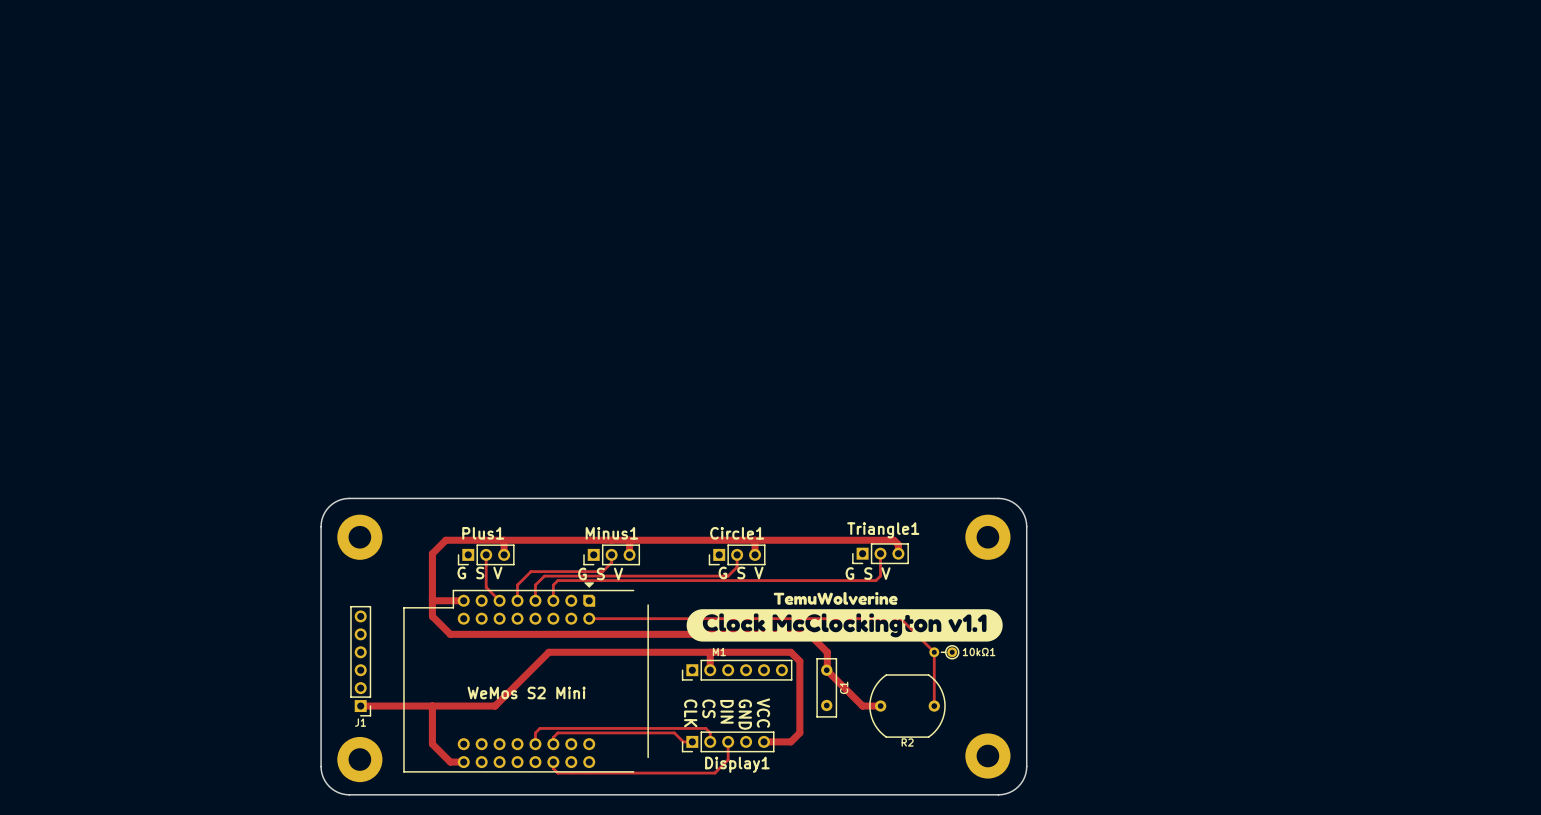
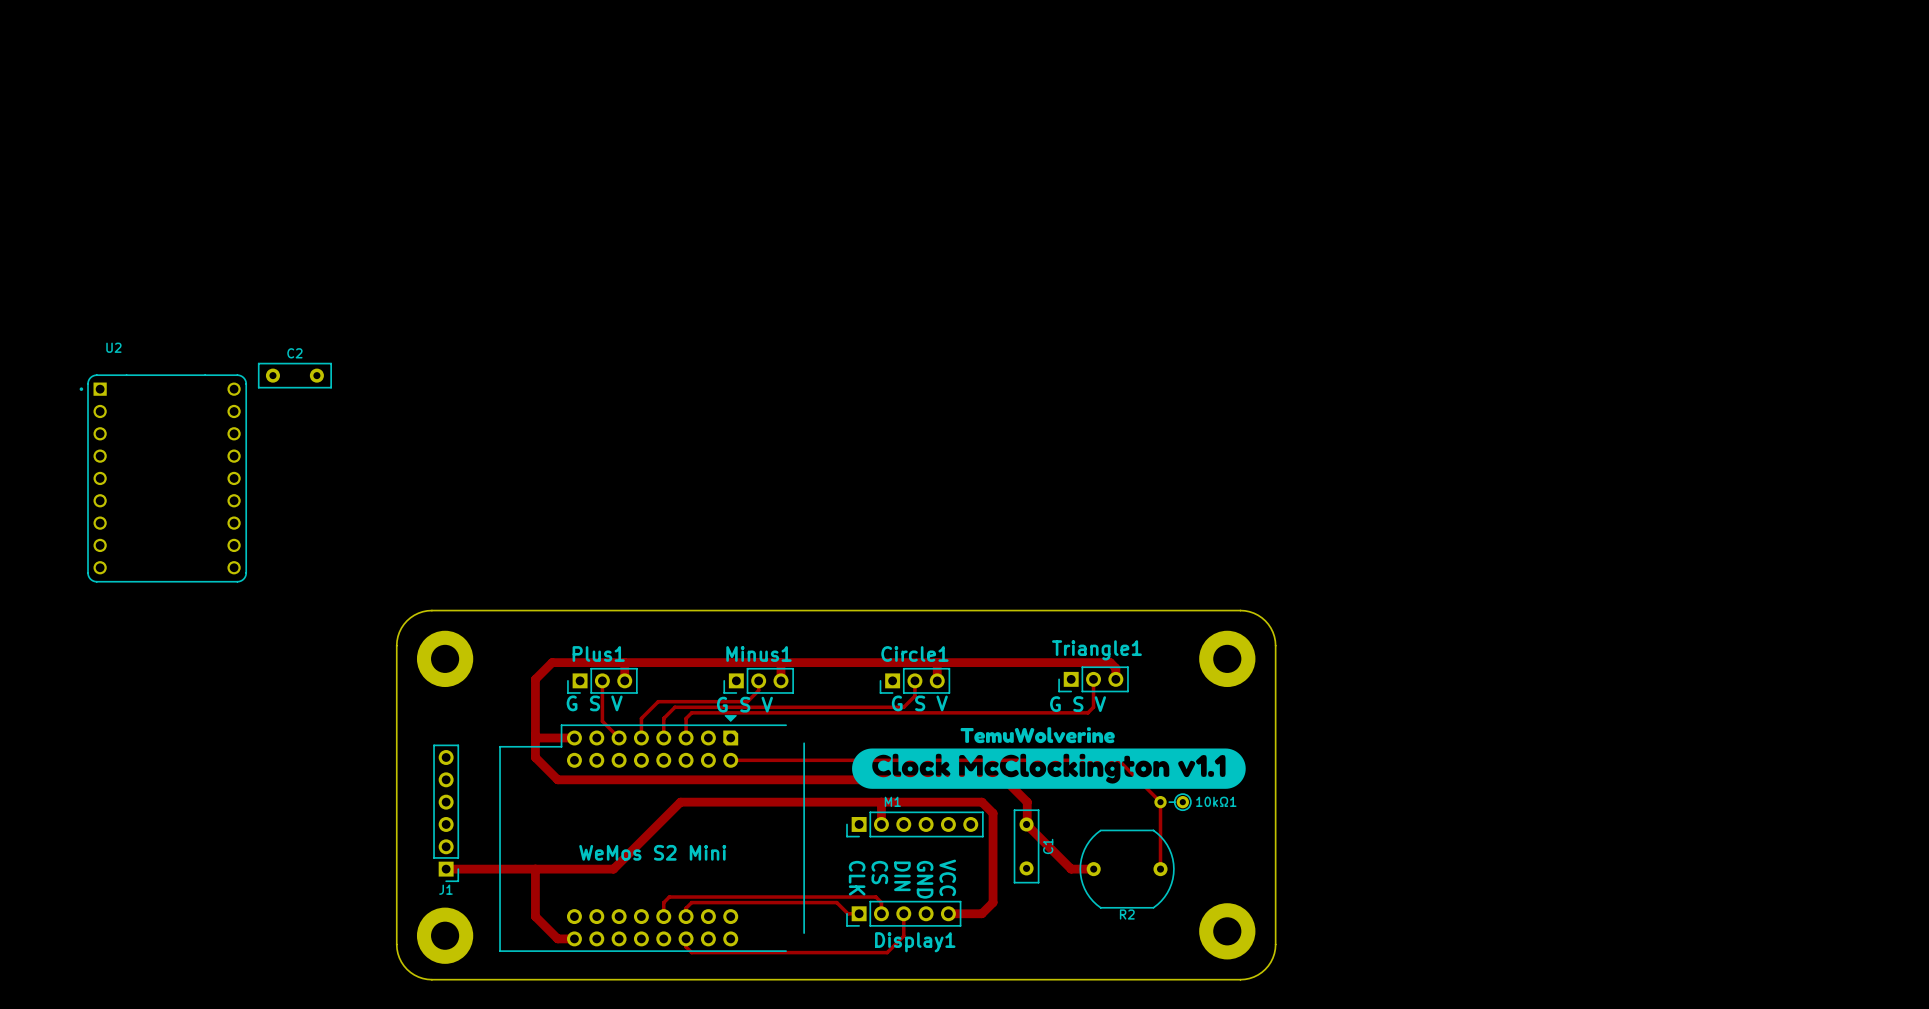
C2: none -> (294, 375)
U2: none -> (163, 478)

